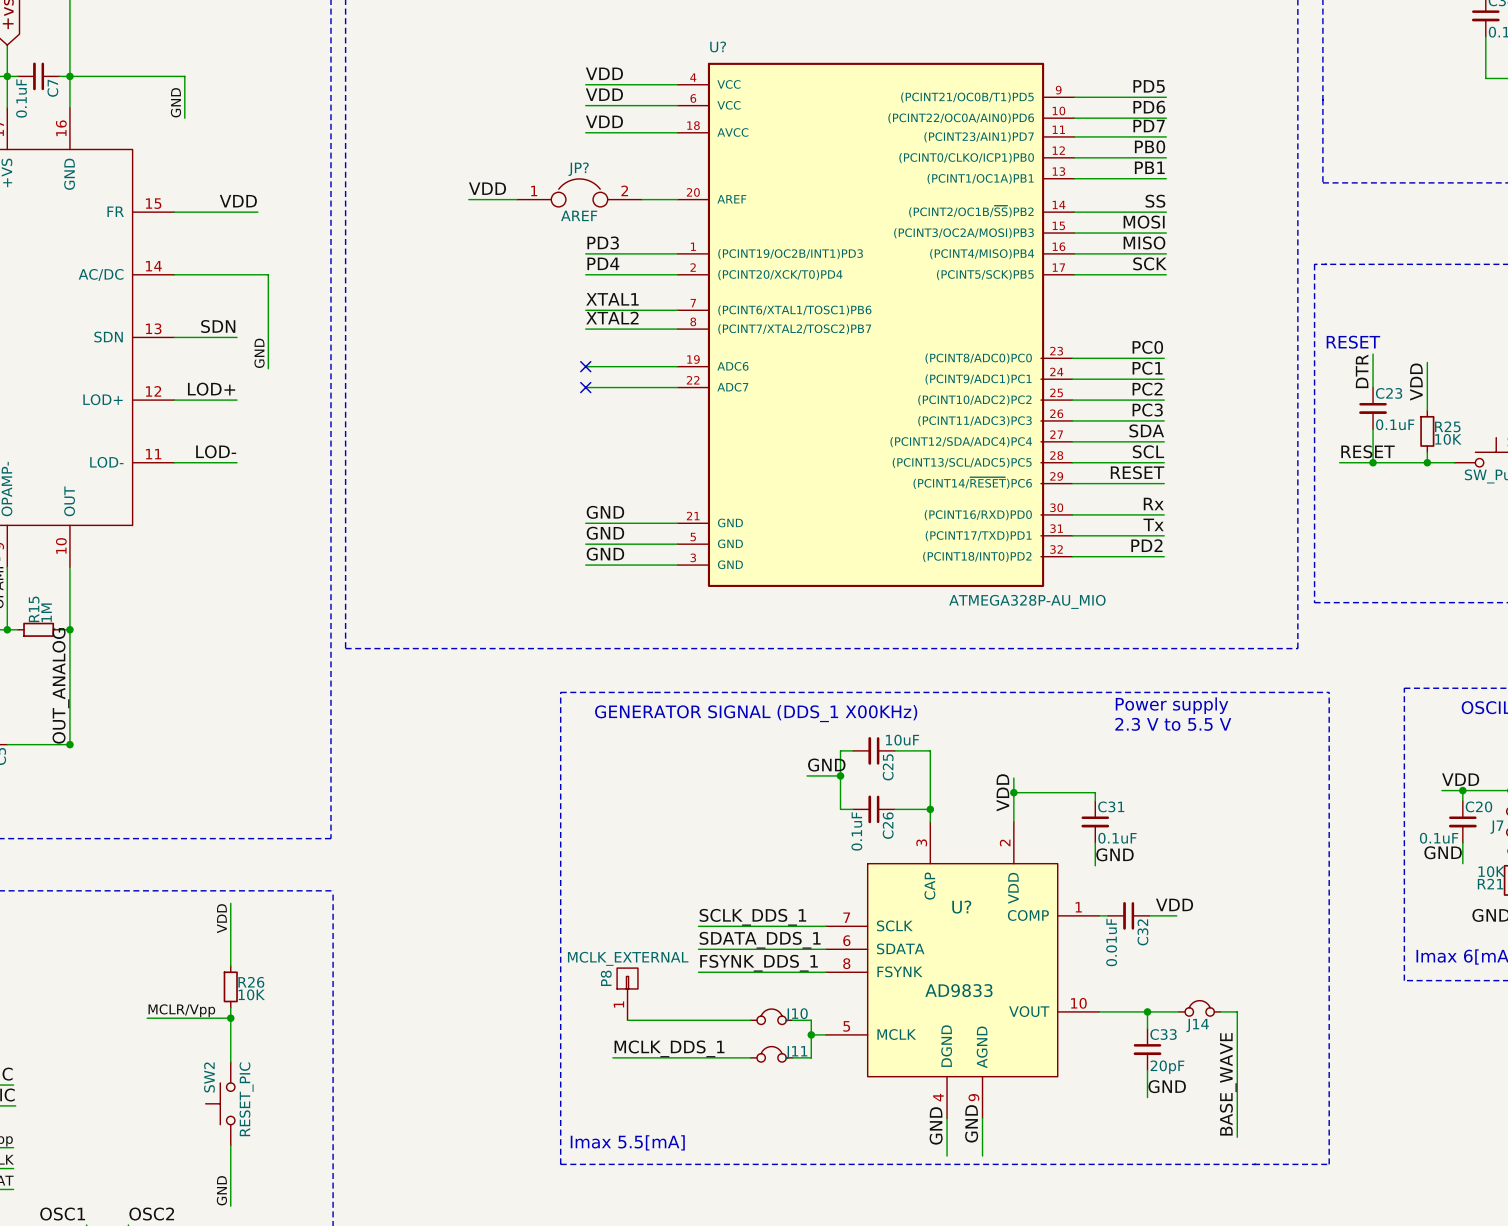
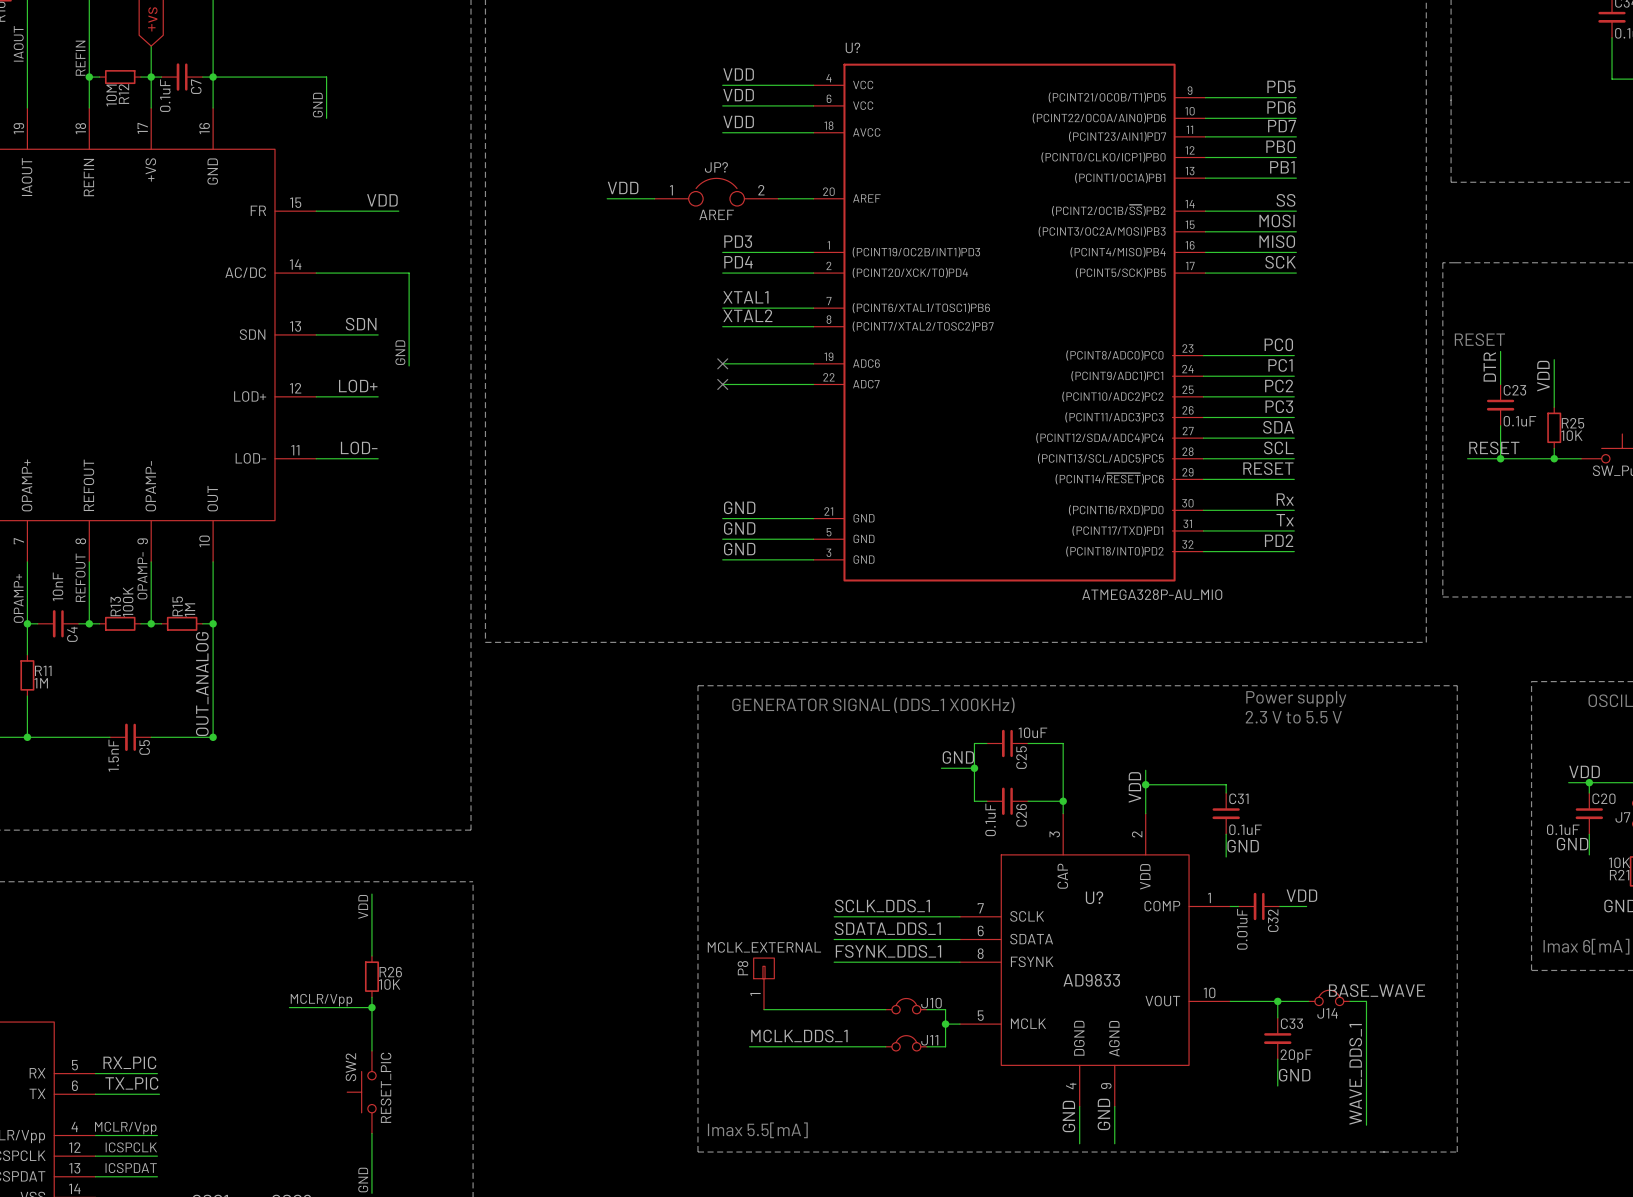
label: none -> BASE_WAVE (1376, 990)
label: BASE_WAVE (1228, 1084) -> WAVE_DDS_1 (1355, 1074)

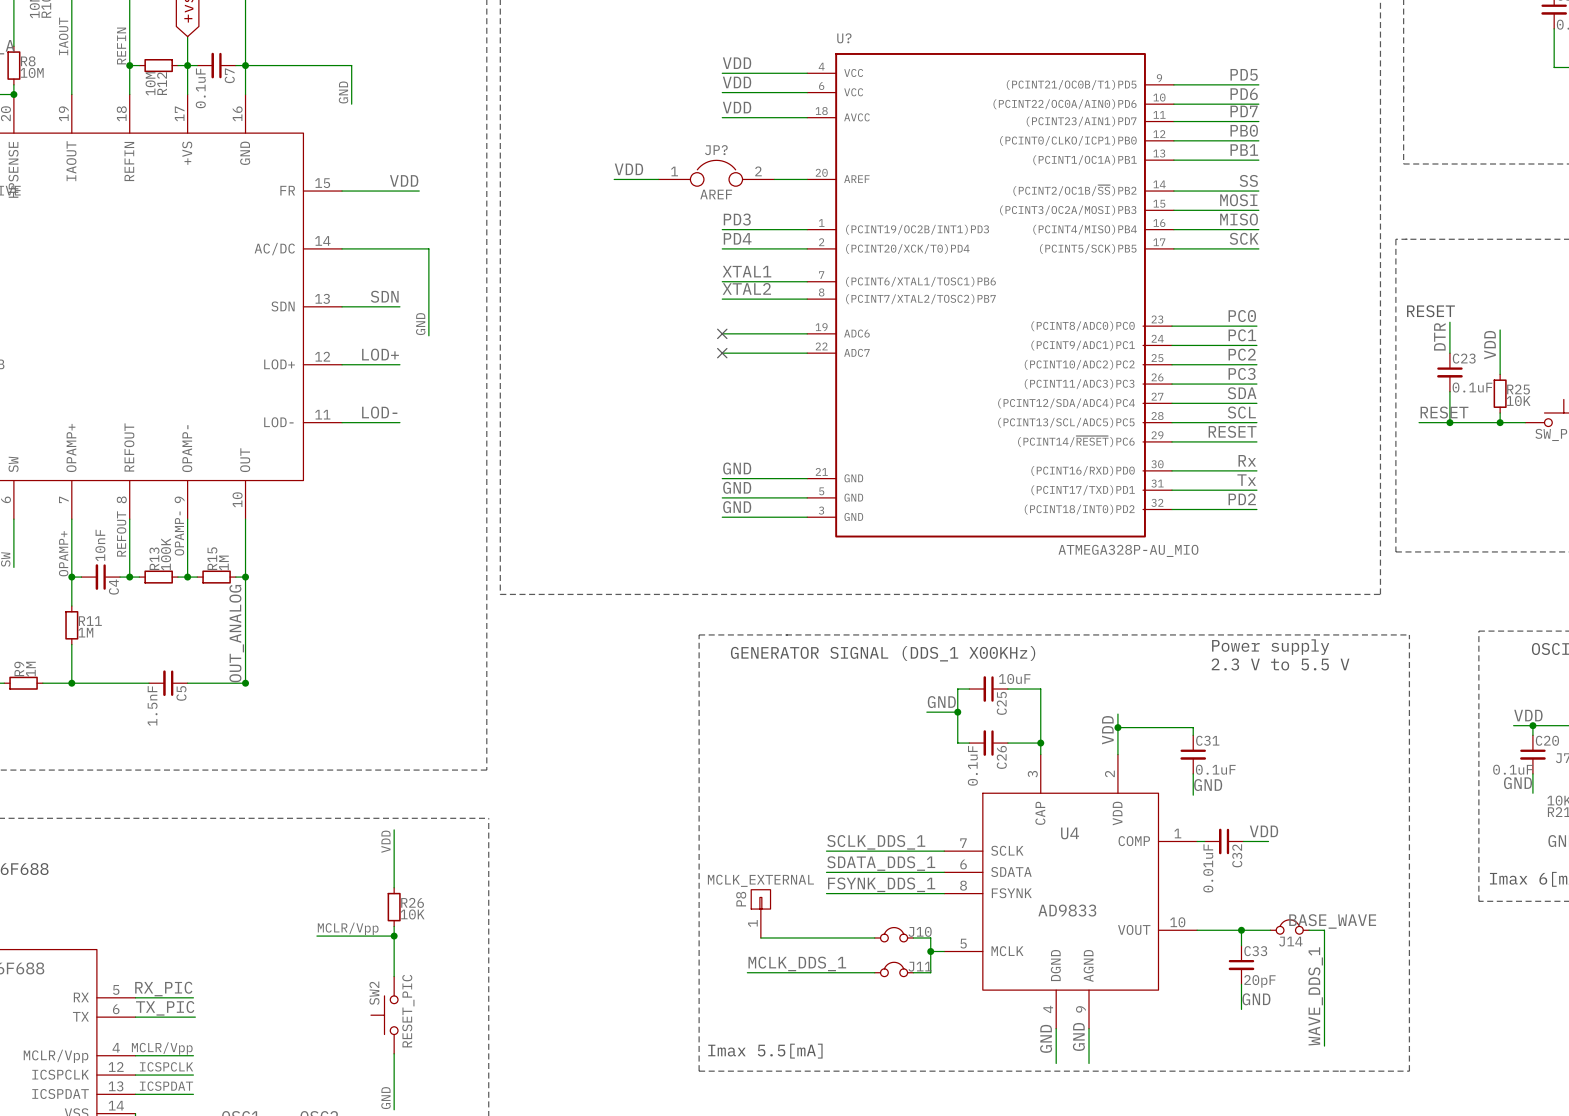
U? name: U? (1094, 897) -> U4 (1070, 833)

